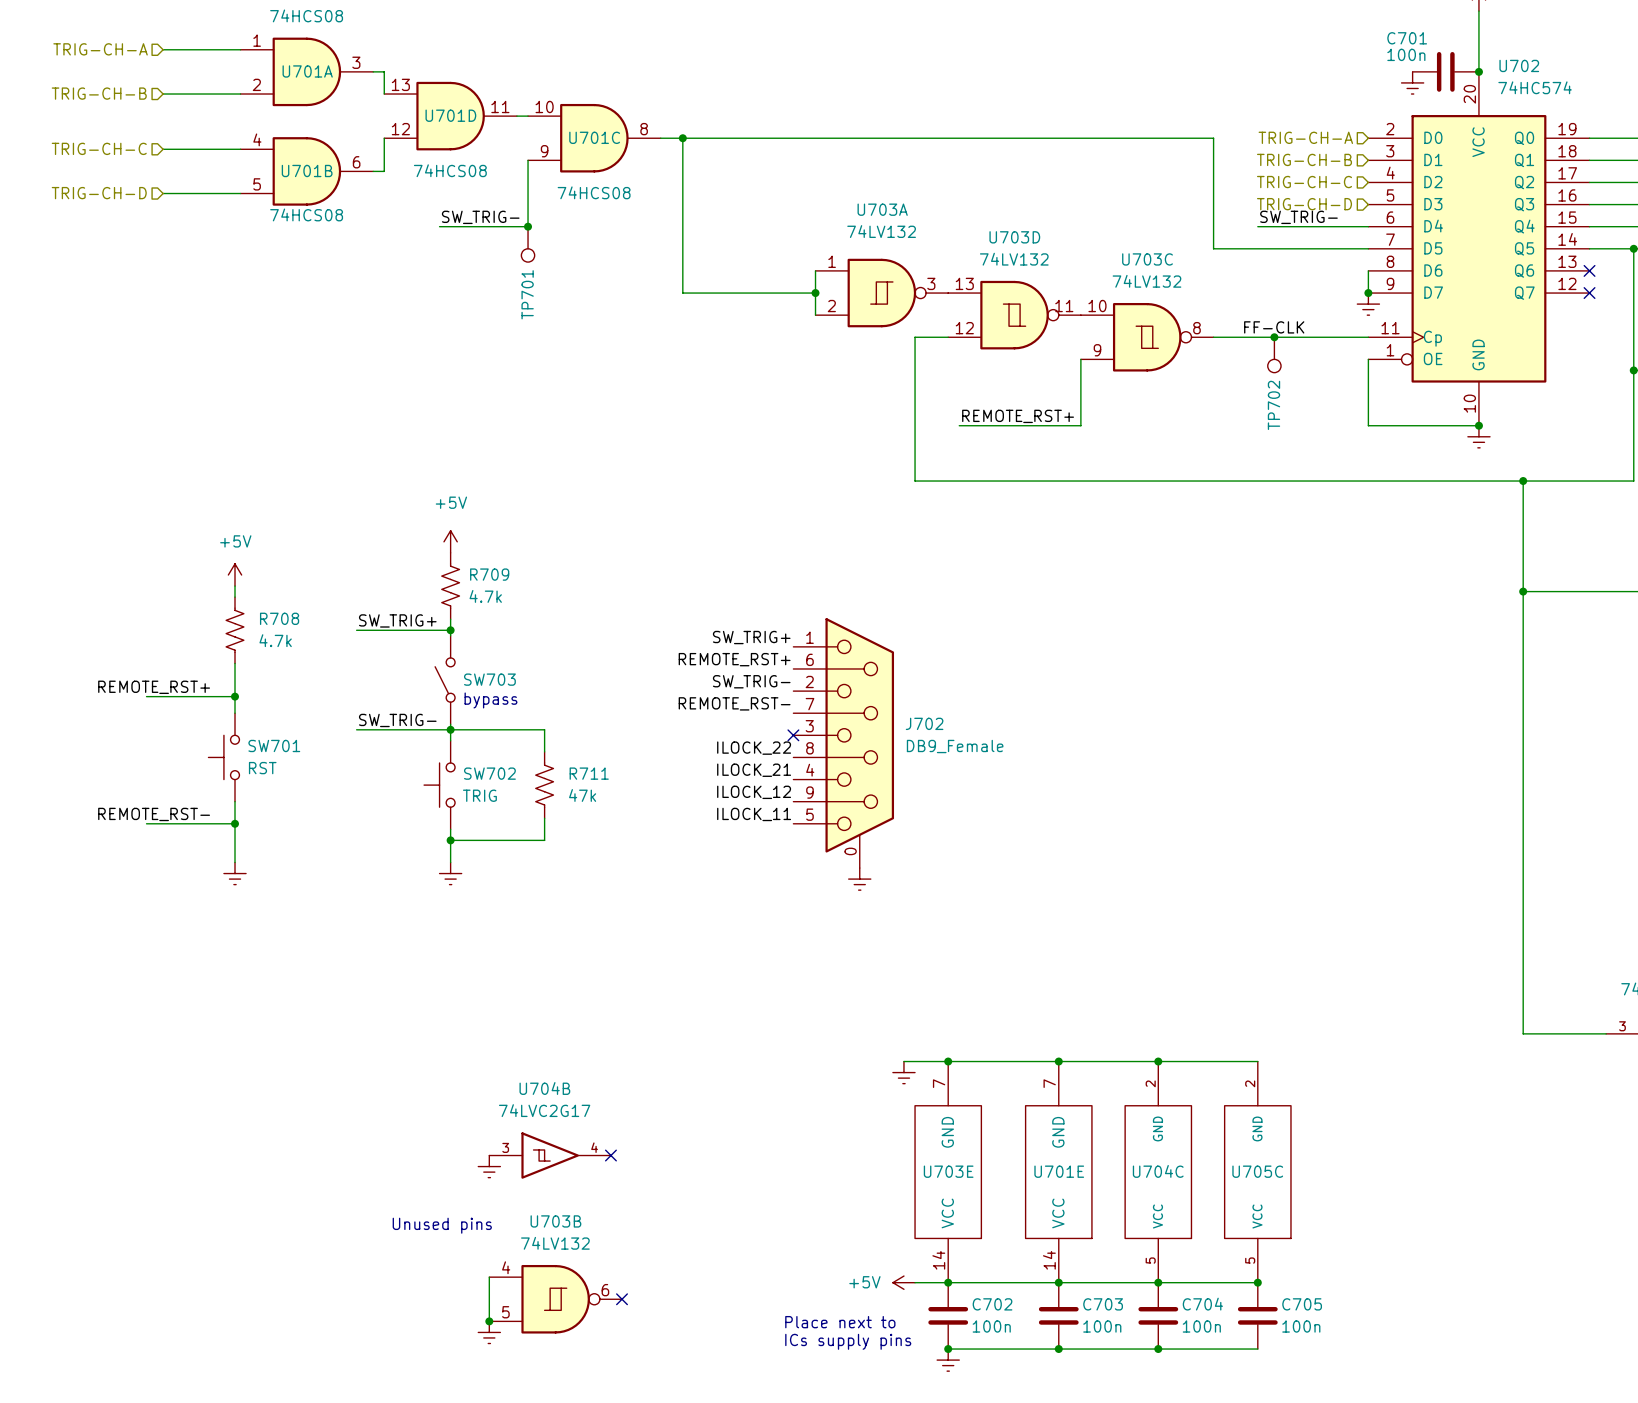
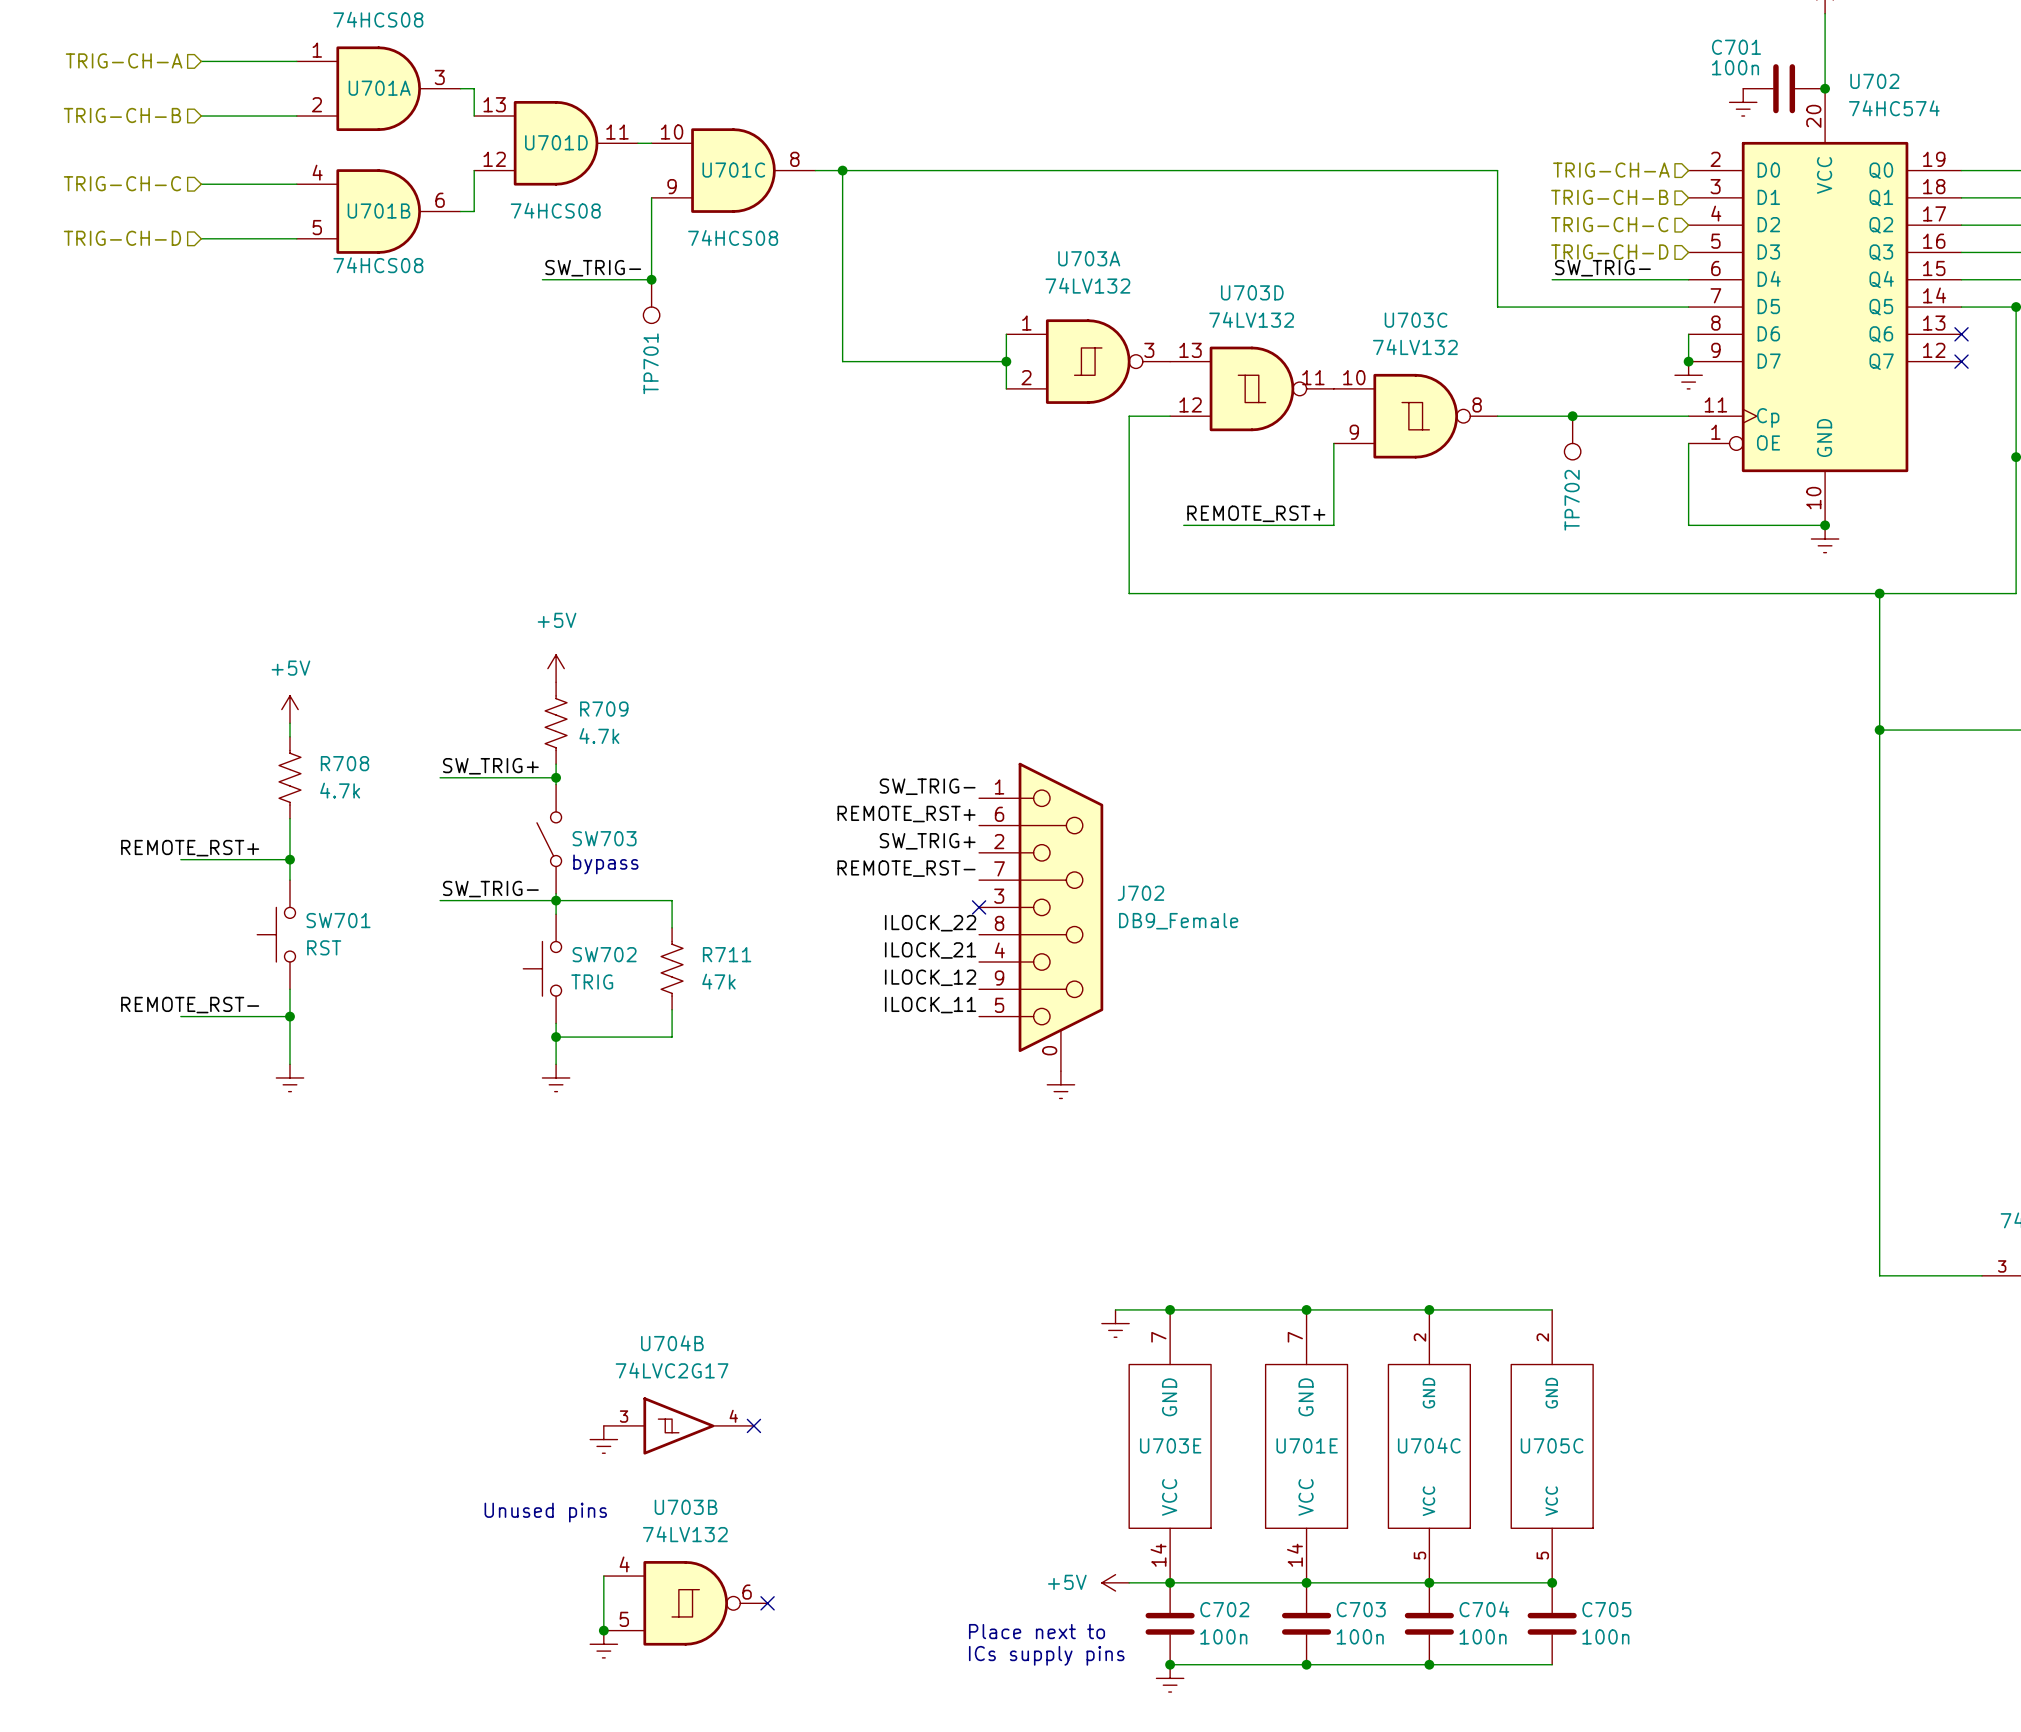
label: FF-CLK (1274, 327) -> none
label: SW_TRIG+ (751, 637) -> SW_TRIG- (927, 786)
label: SW_TRIG- (751, 681) -> SW_TRIG+ (927, 841)

